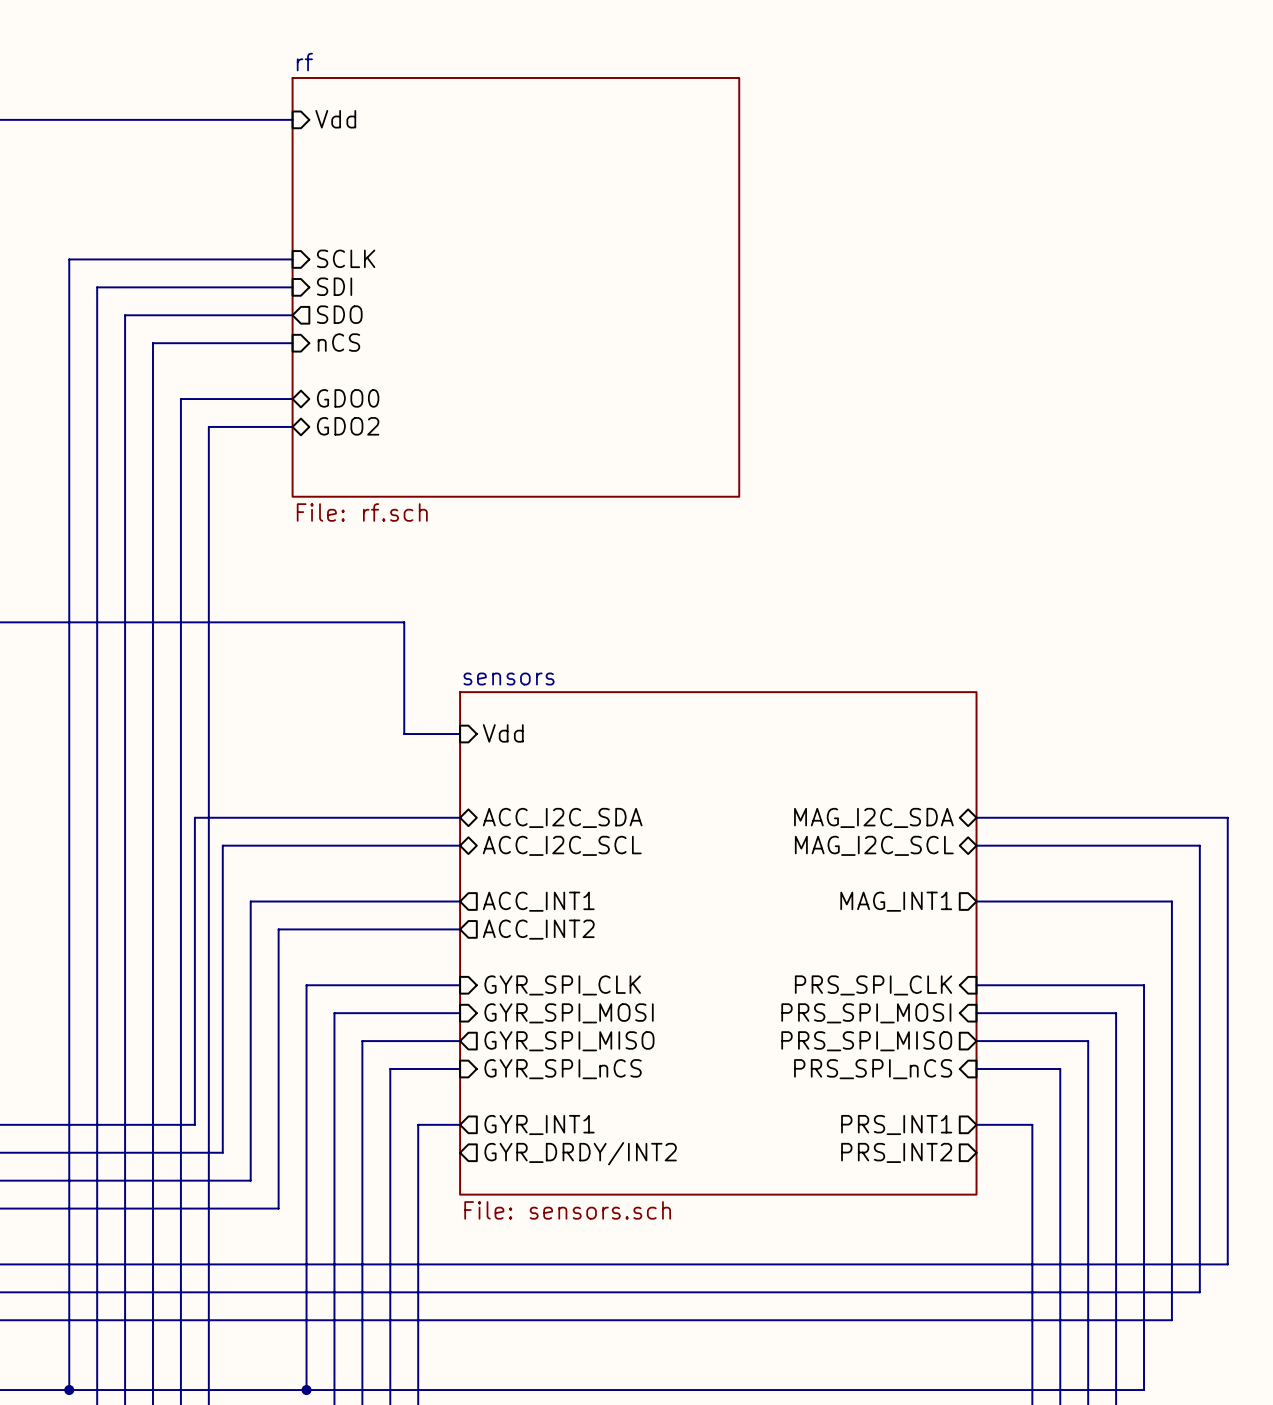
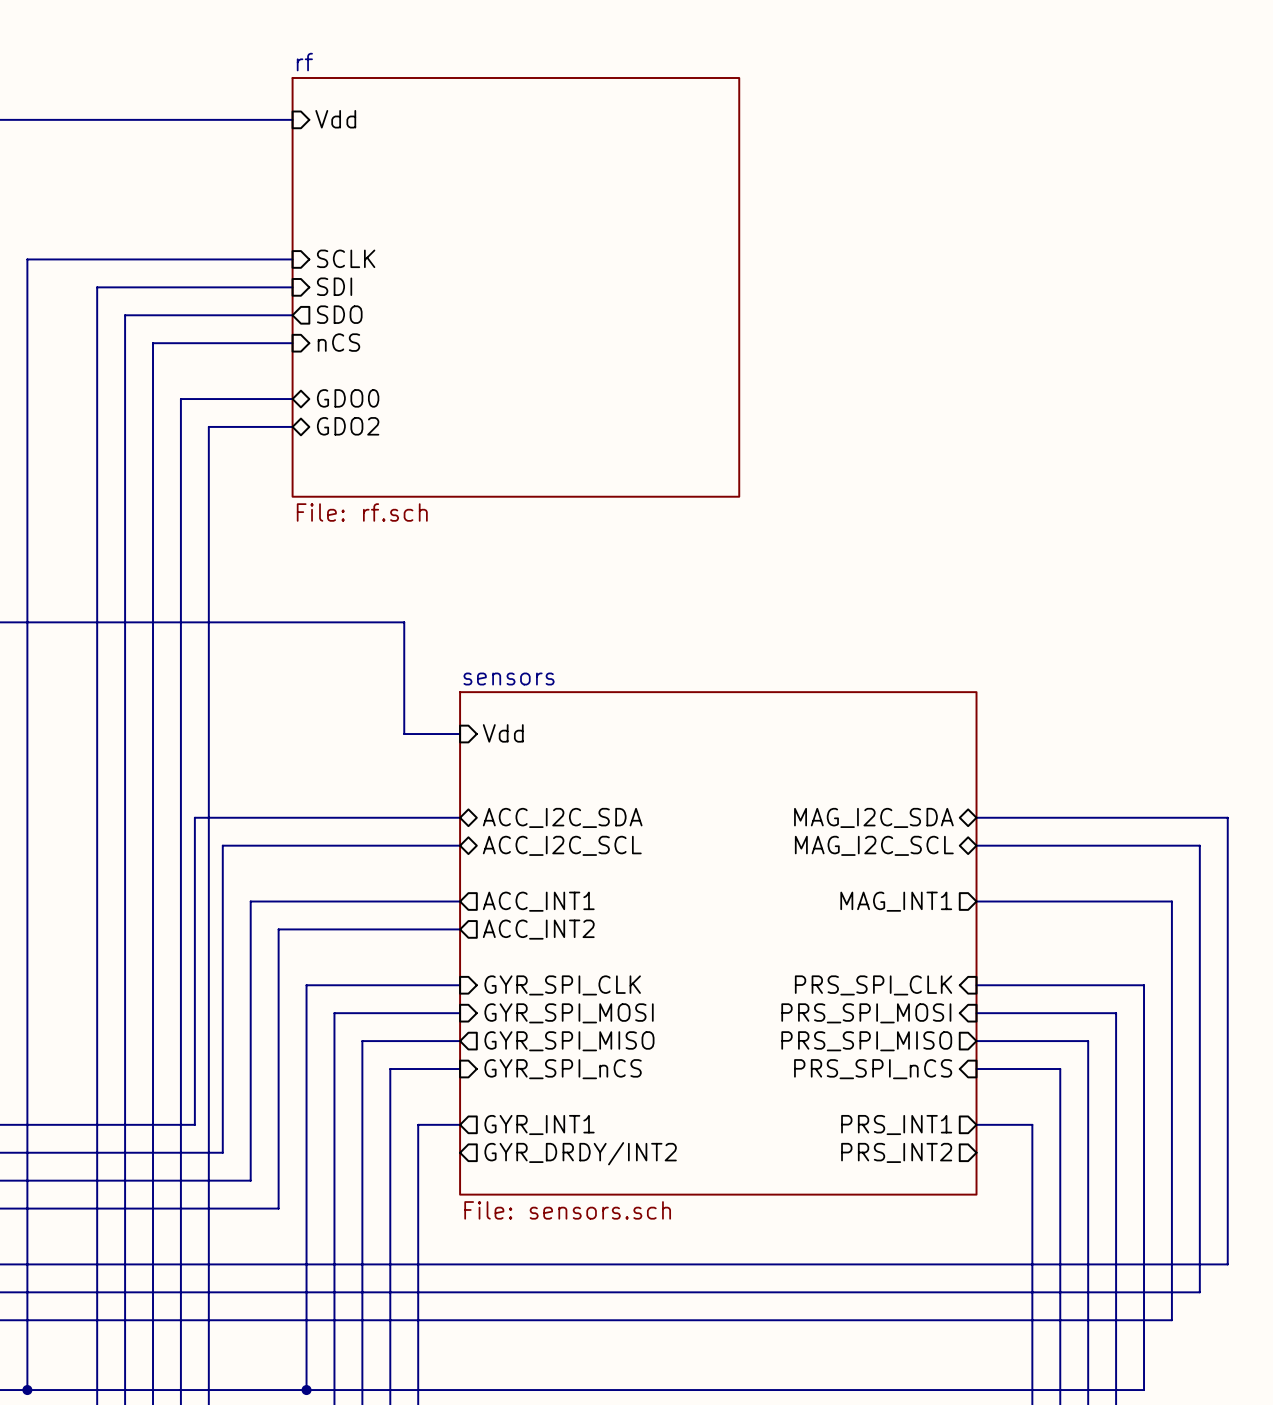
wire: (69, 259) (69, 1390) -> (69, 259) (27, 259) (27, 1390)
junction: none -> (27, 1390)
junction: (69, 1390) -> none

